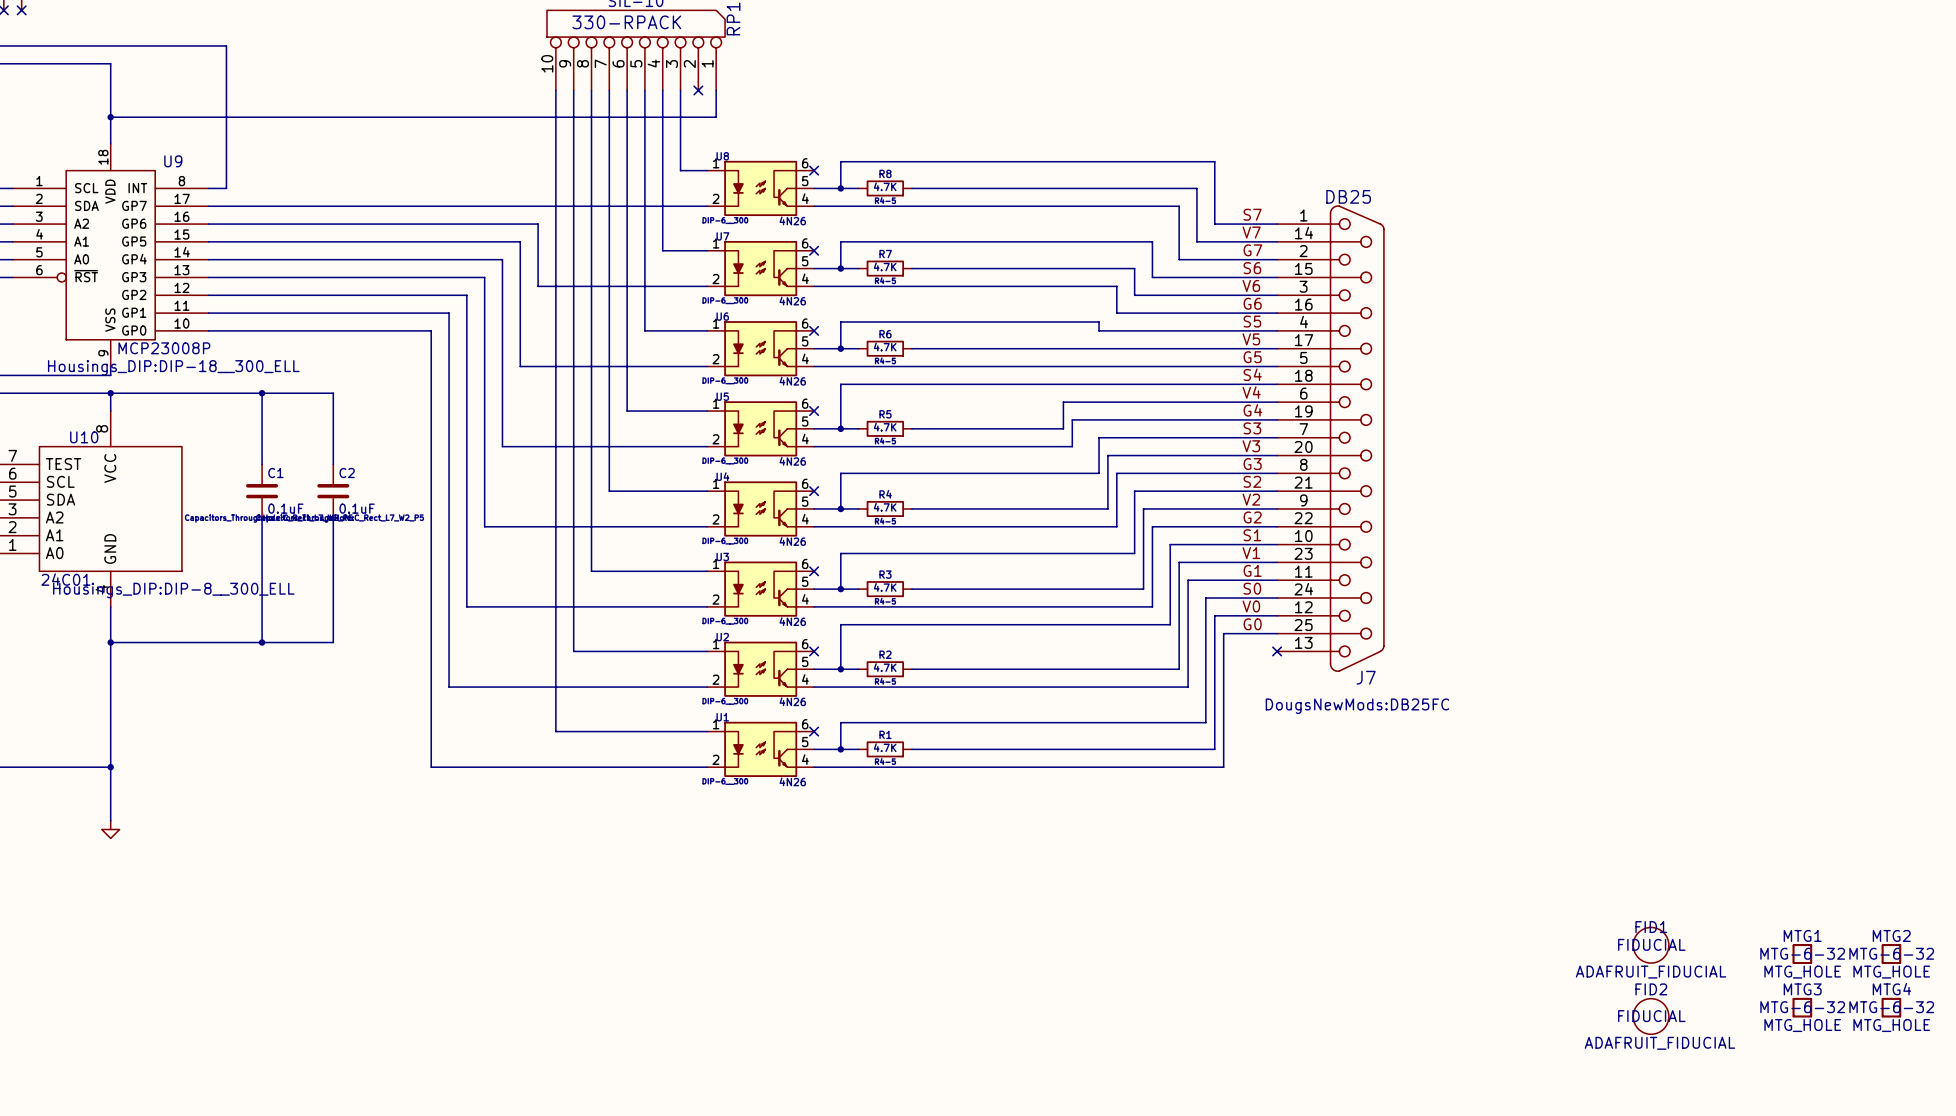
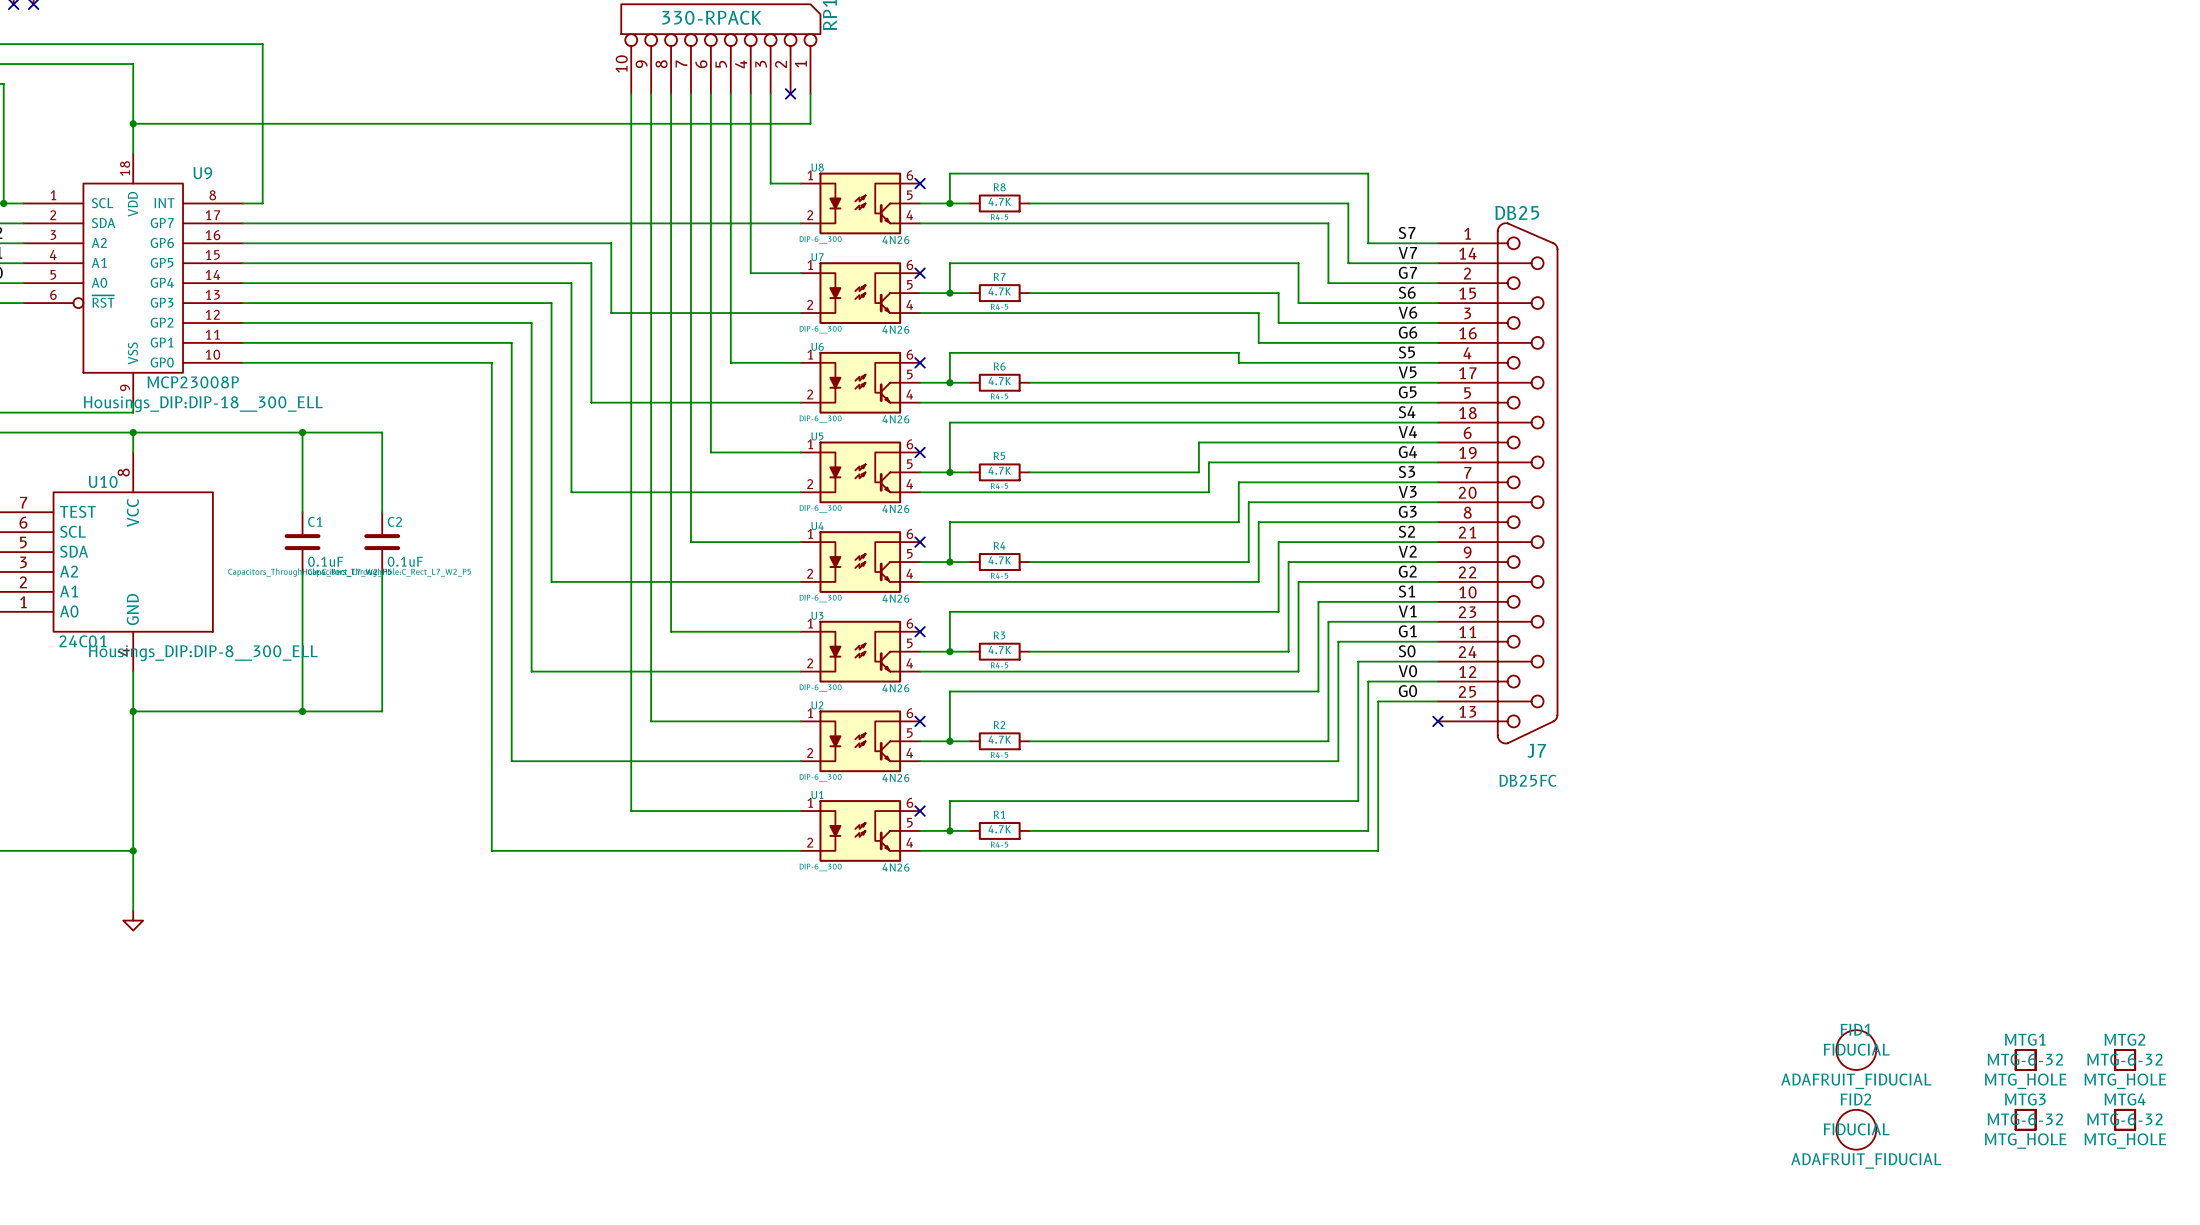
J7 text: DougsNewMods:DB25FC (1357, 706) -> DB25FC (1527, 780)

